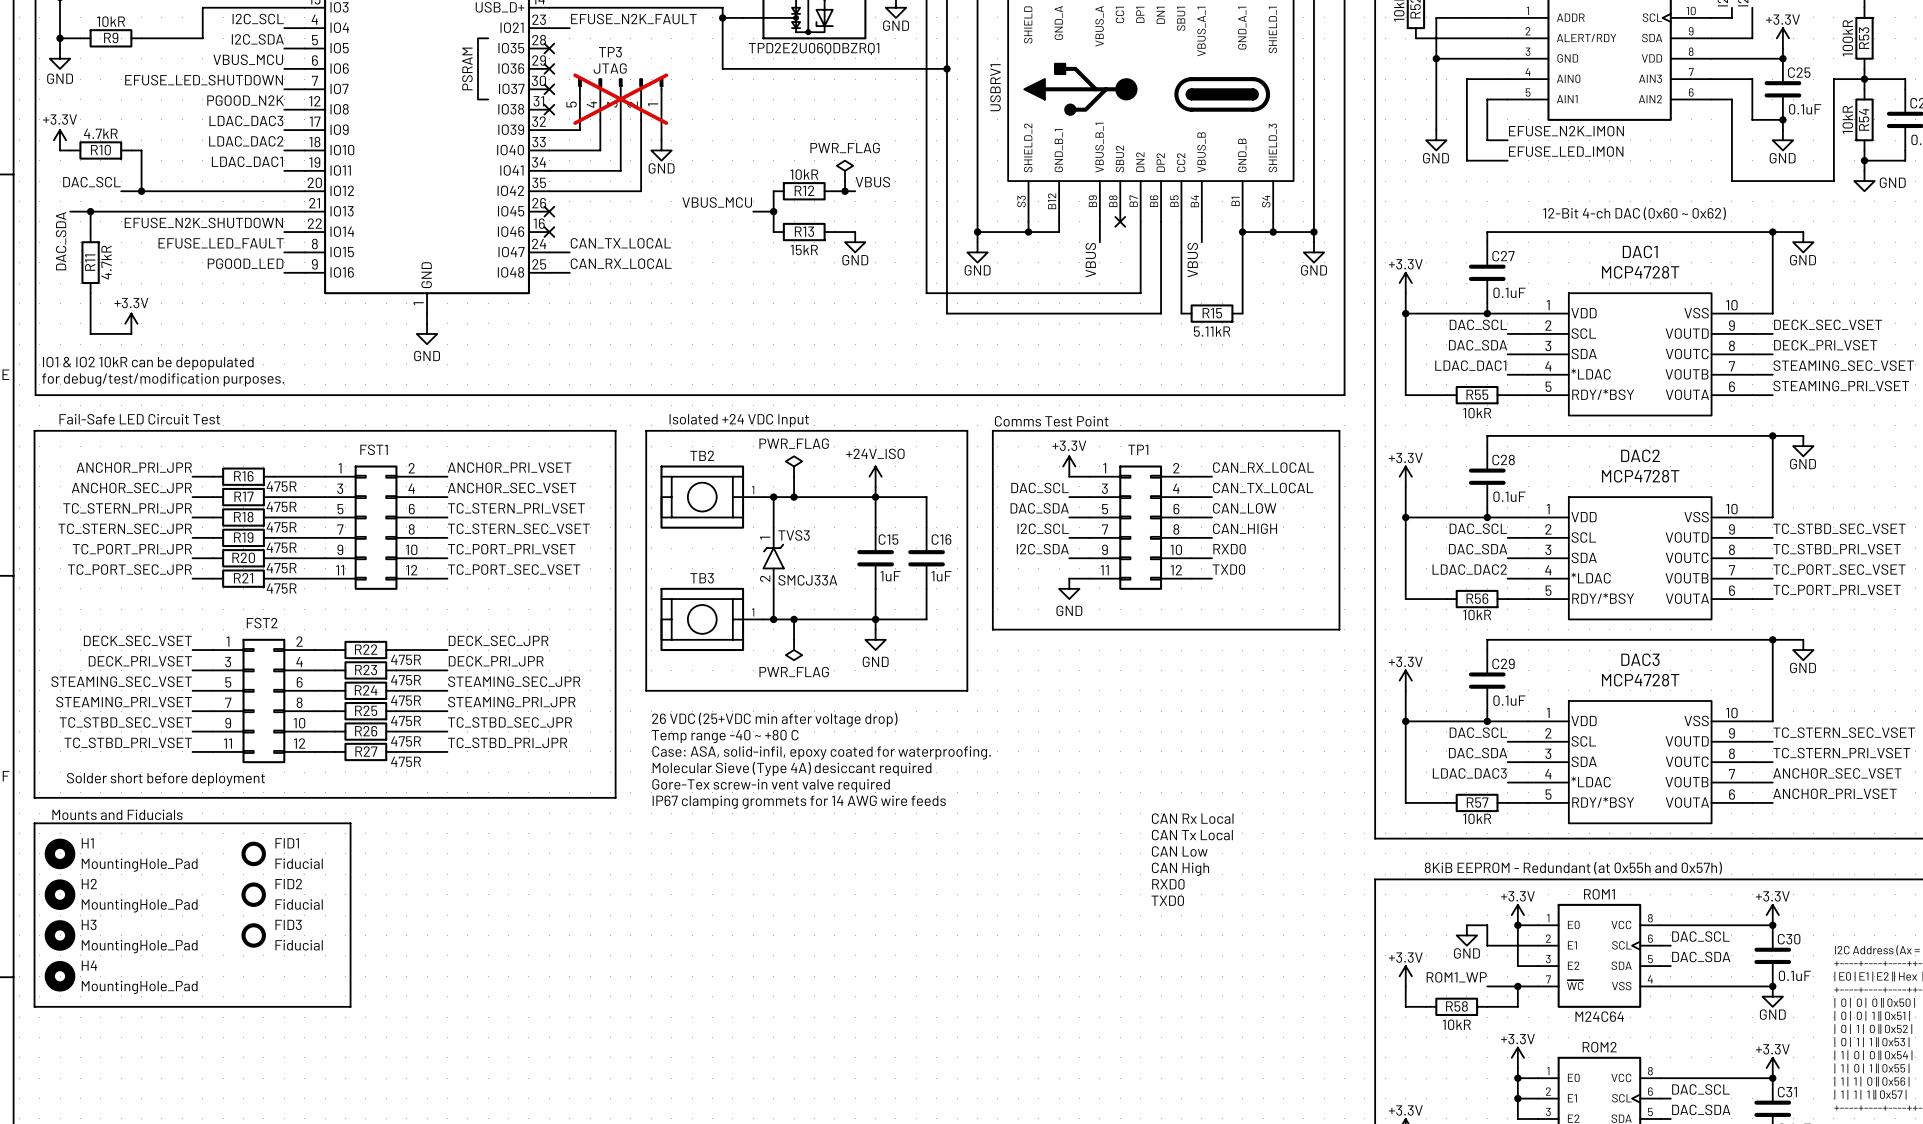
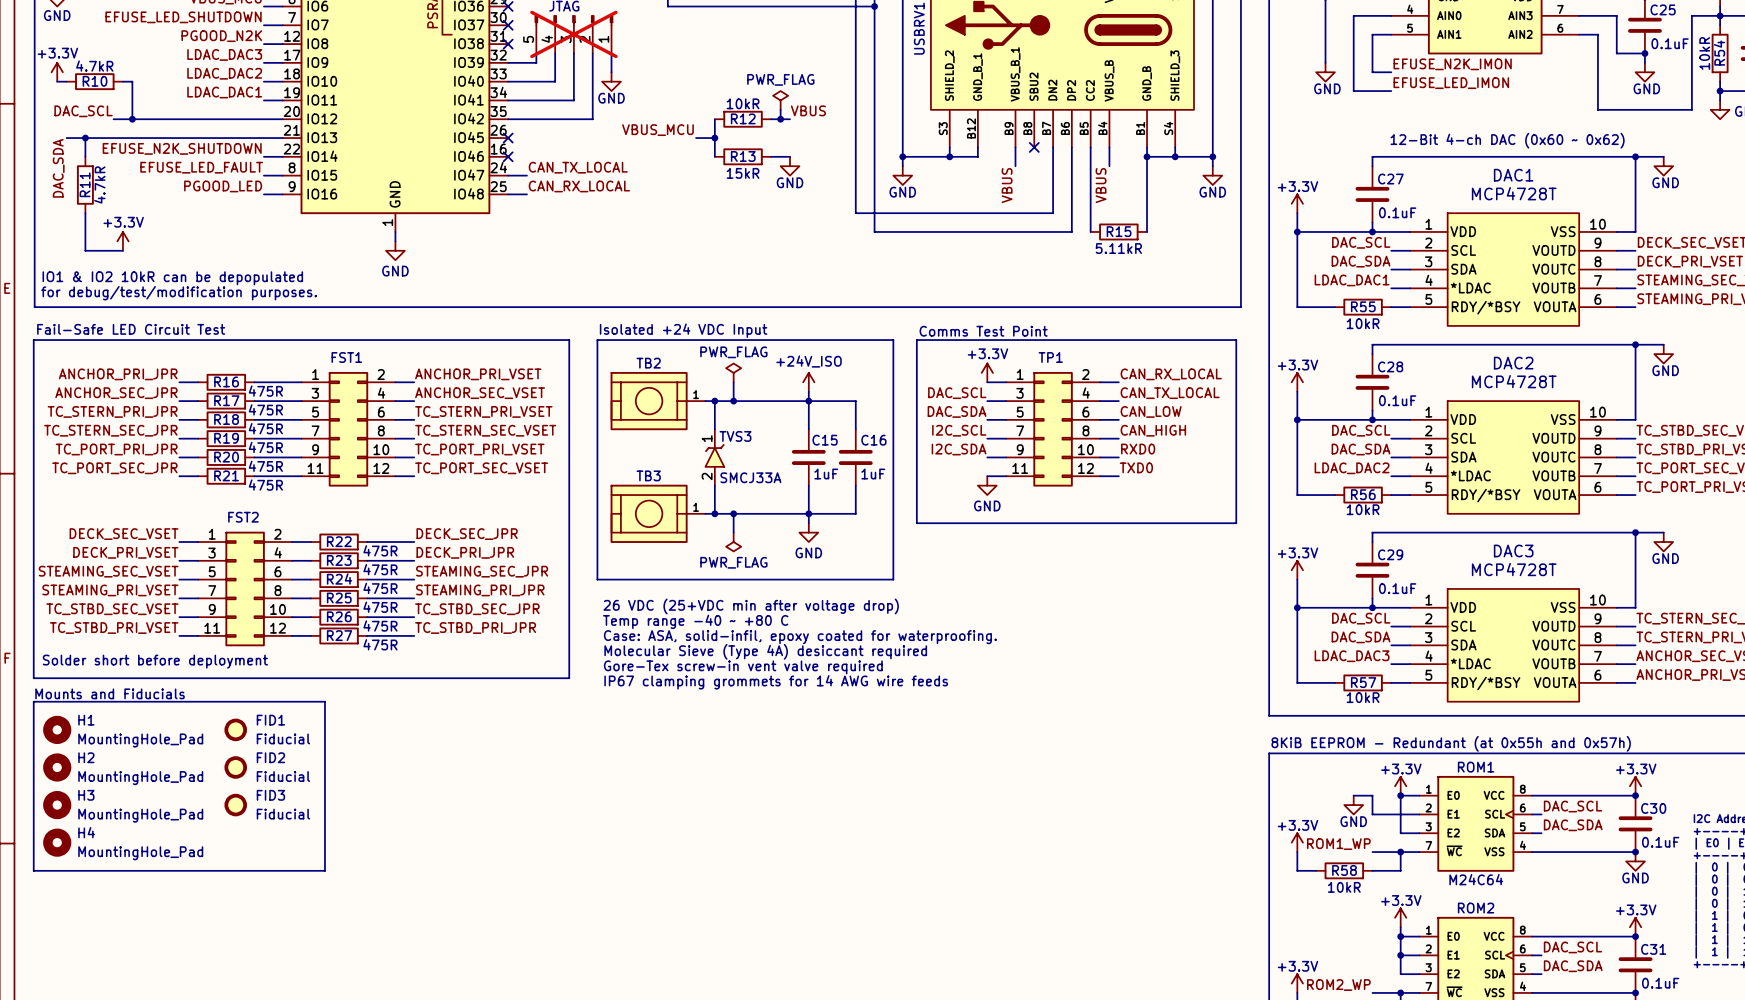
text: CAN Rx Local (1192, 818) -> none
text: CAN Tx Local (1192, 835) -> none
text: CAN Low (1179, 851) -> none
text: CAN High (1180, 869) -> none
text: RXD0 (1168, 884) -> none
text: TXD0 (1167, 900) -> none

